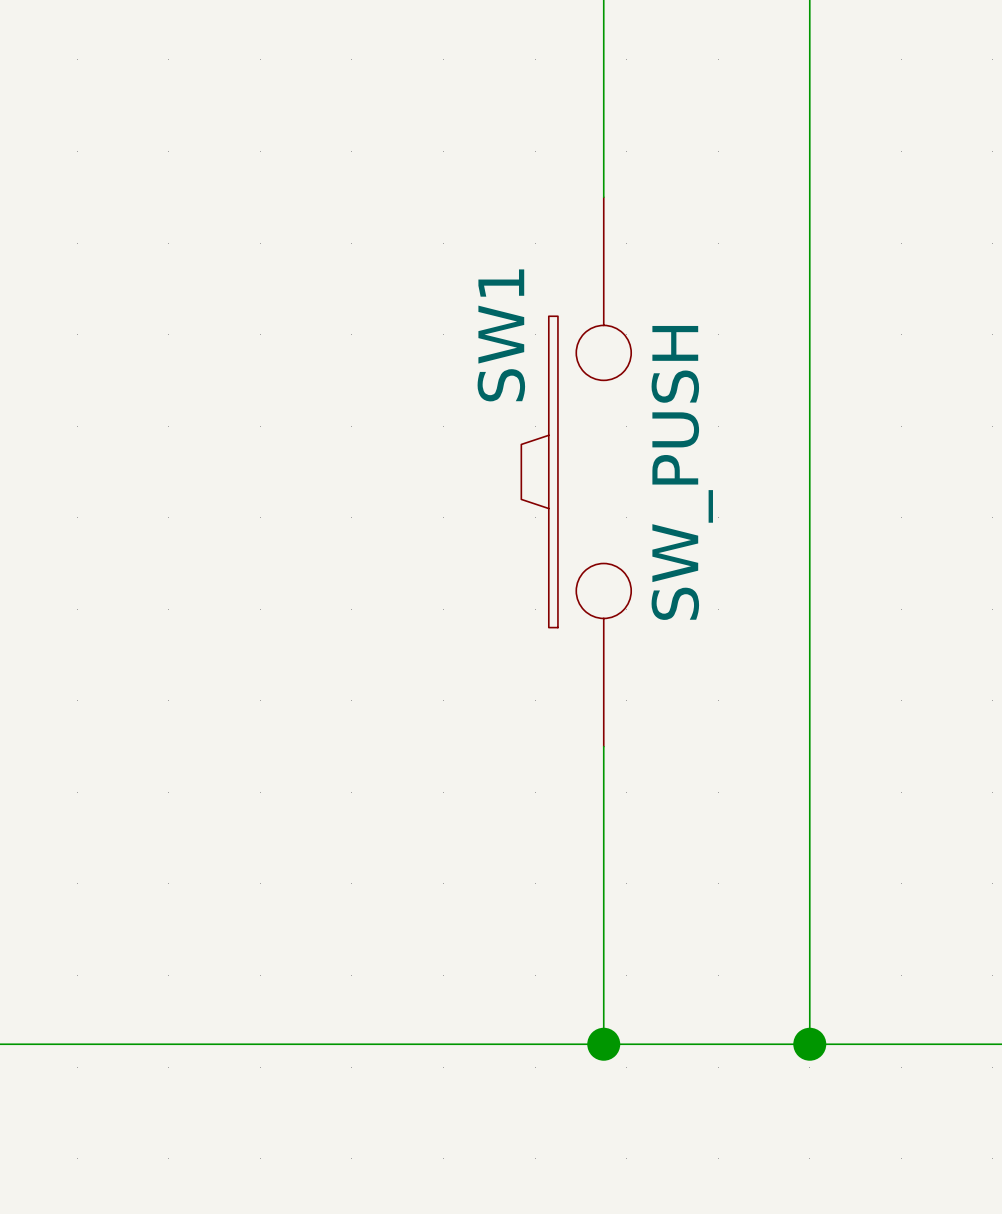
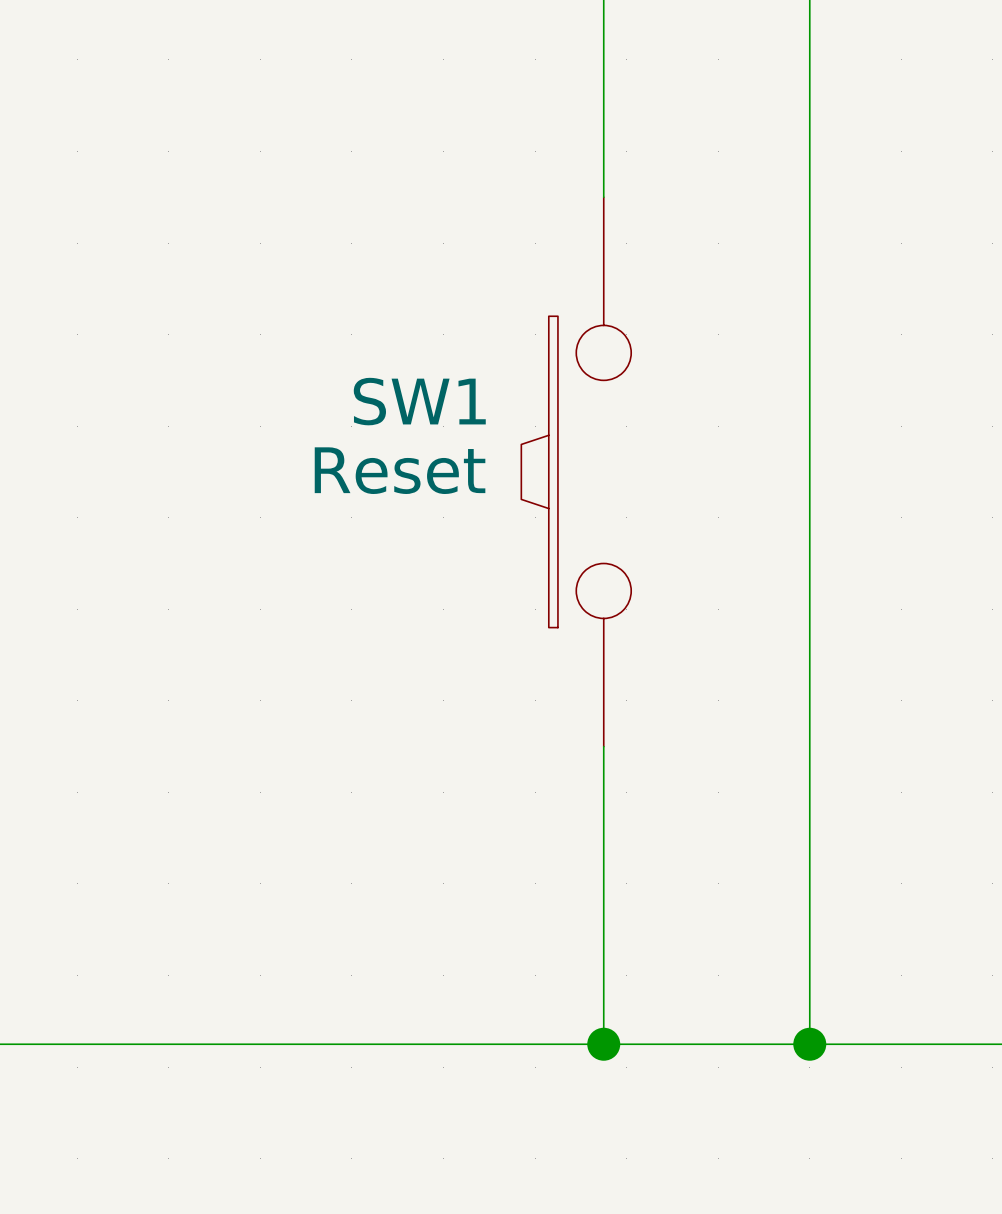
SW1 name rotation: 0° (501, 335) -> 90° clockwise (419, 401)
SW1 value: SW_PUSH (682, 472) -> Reset (400, 470)

